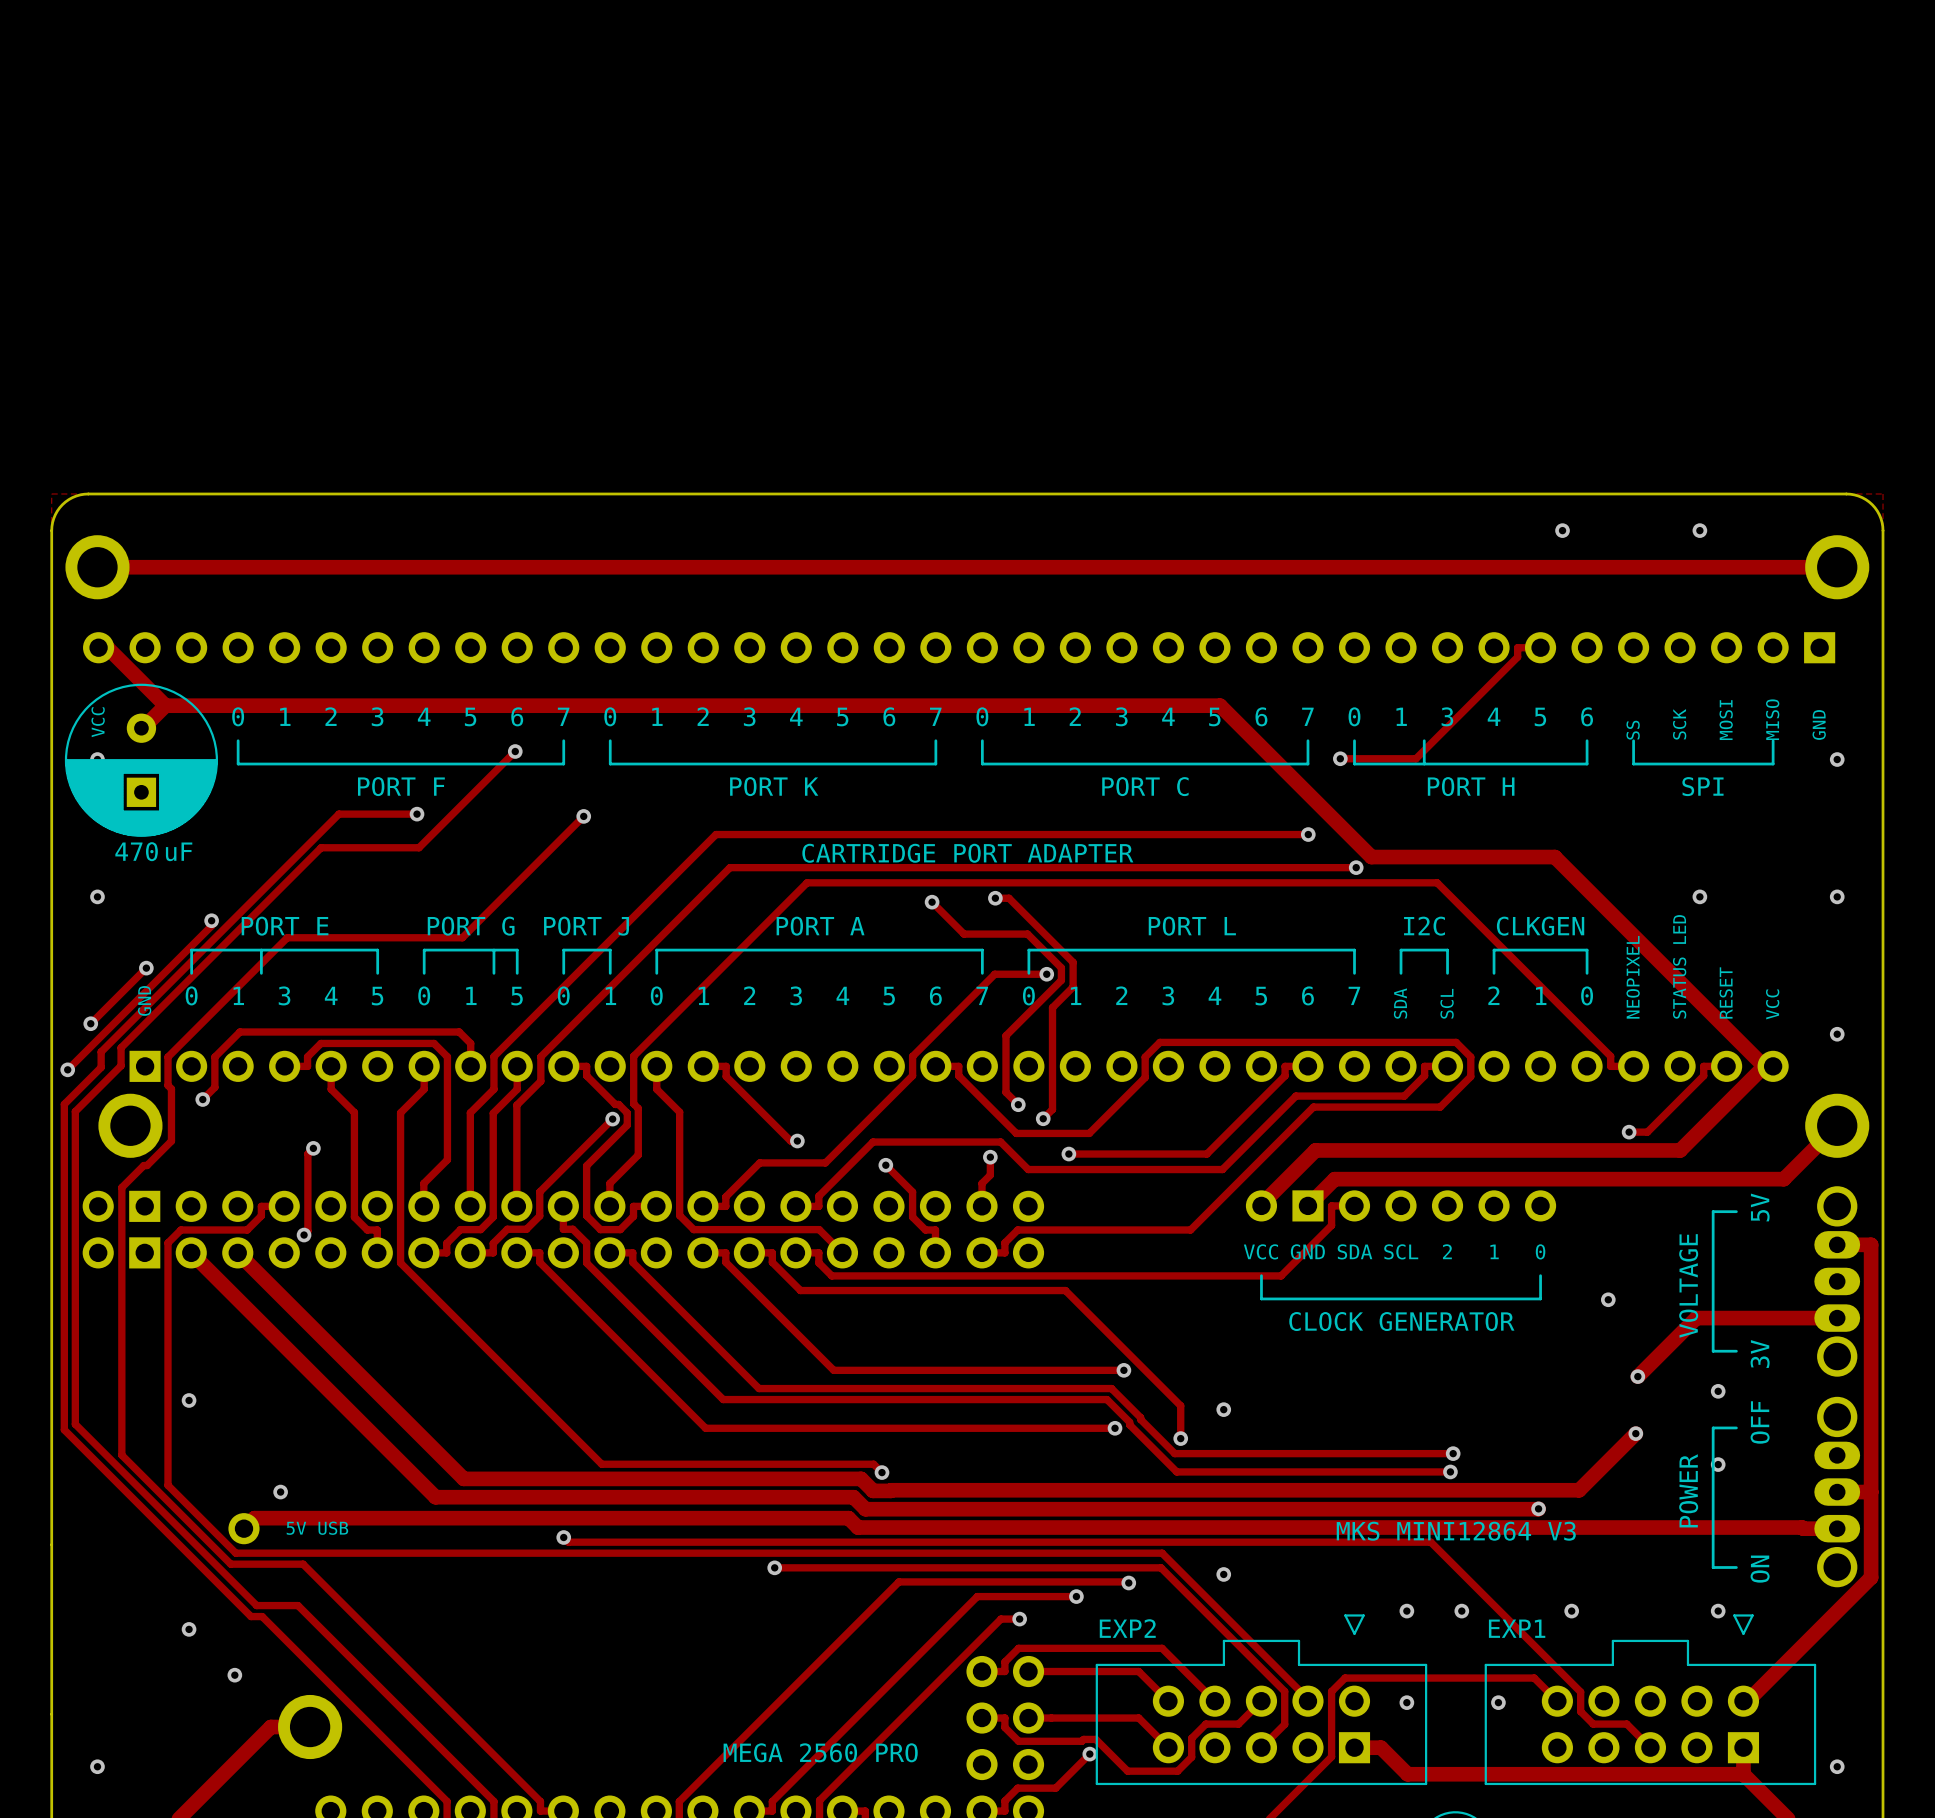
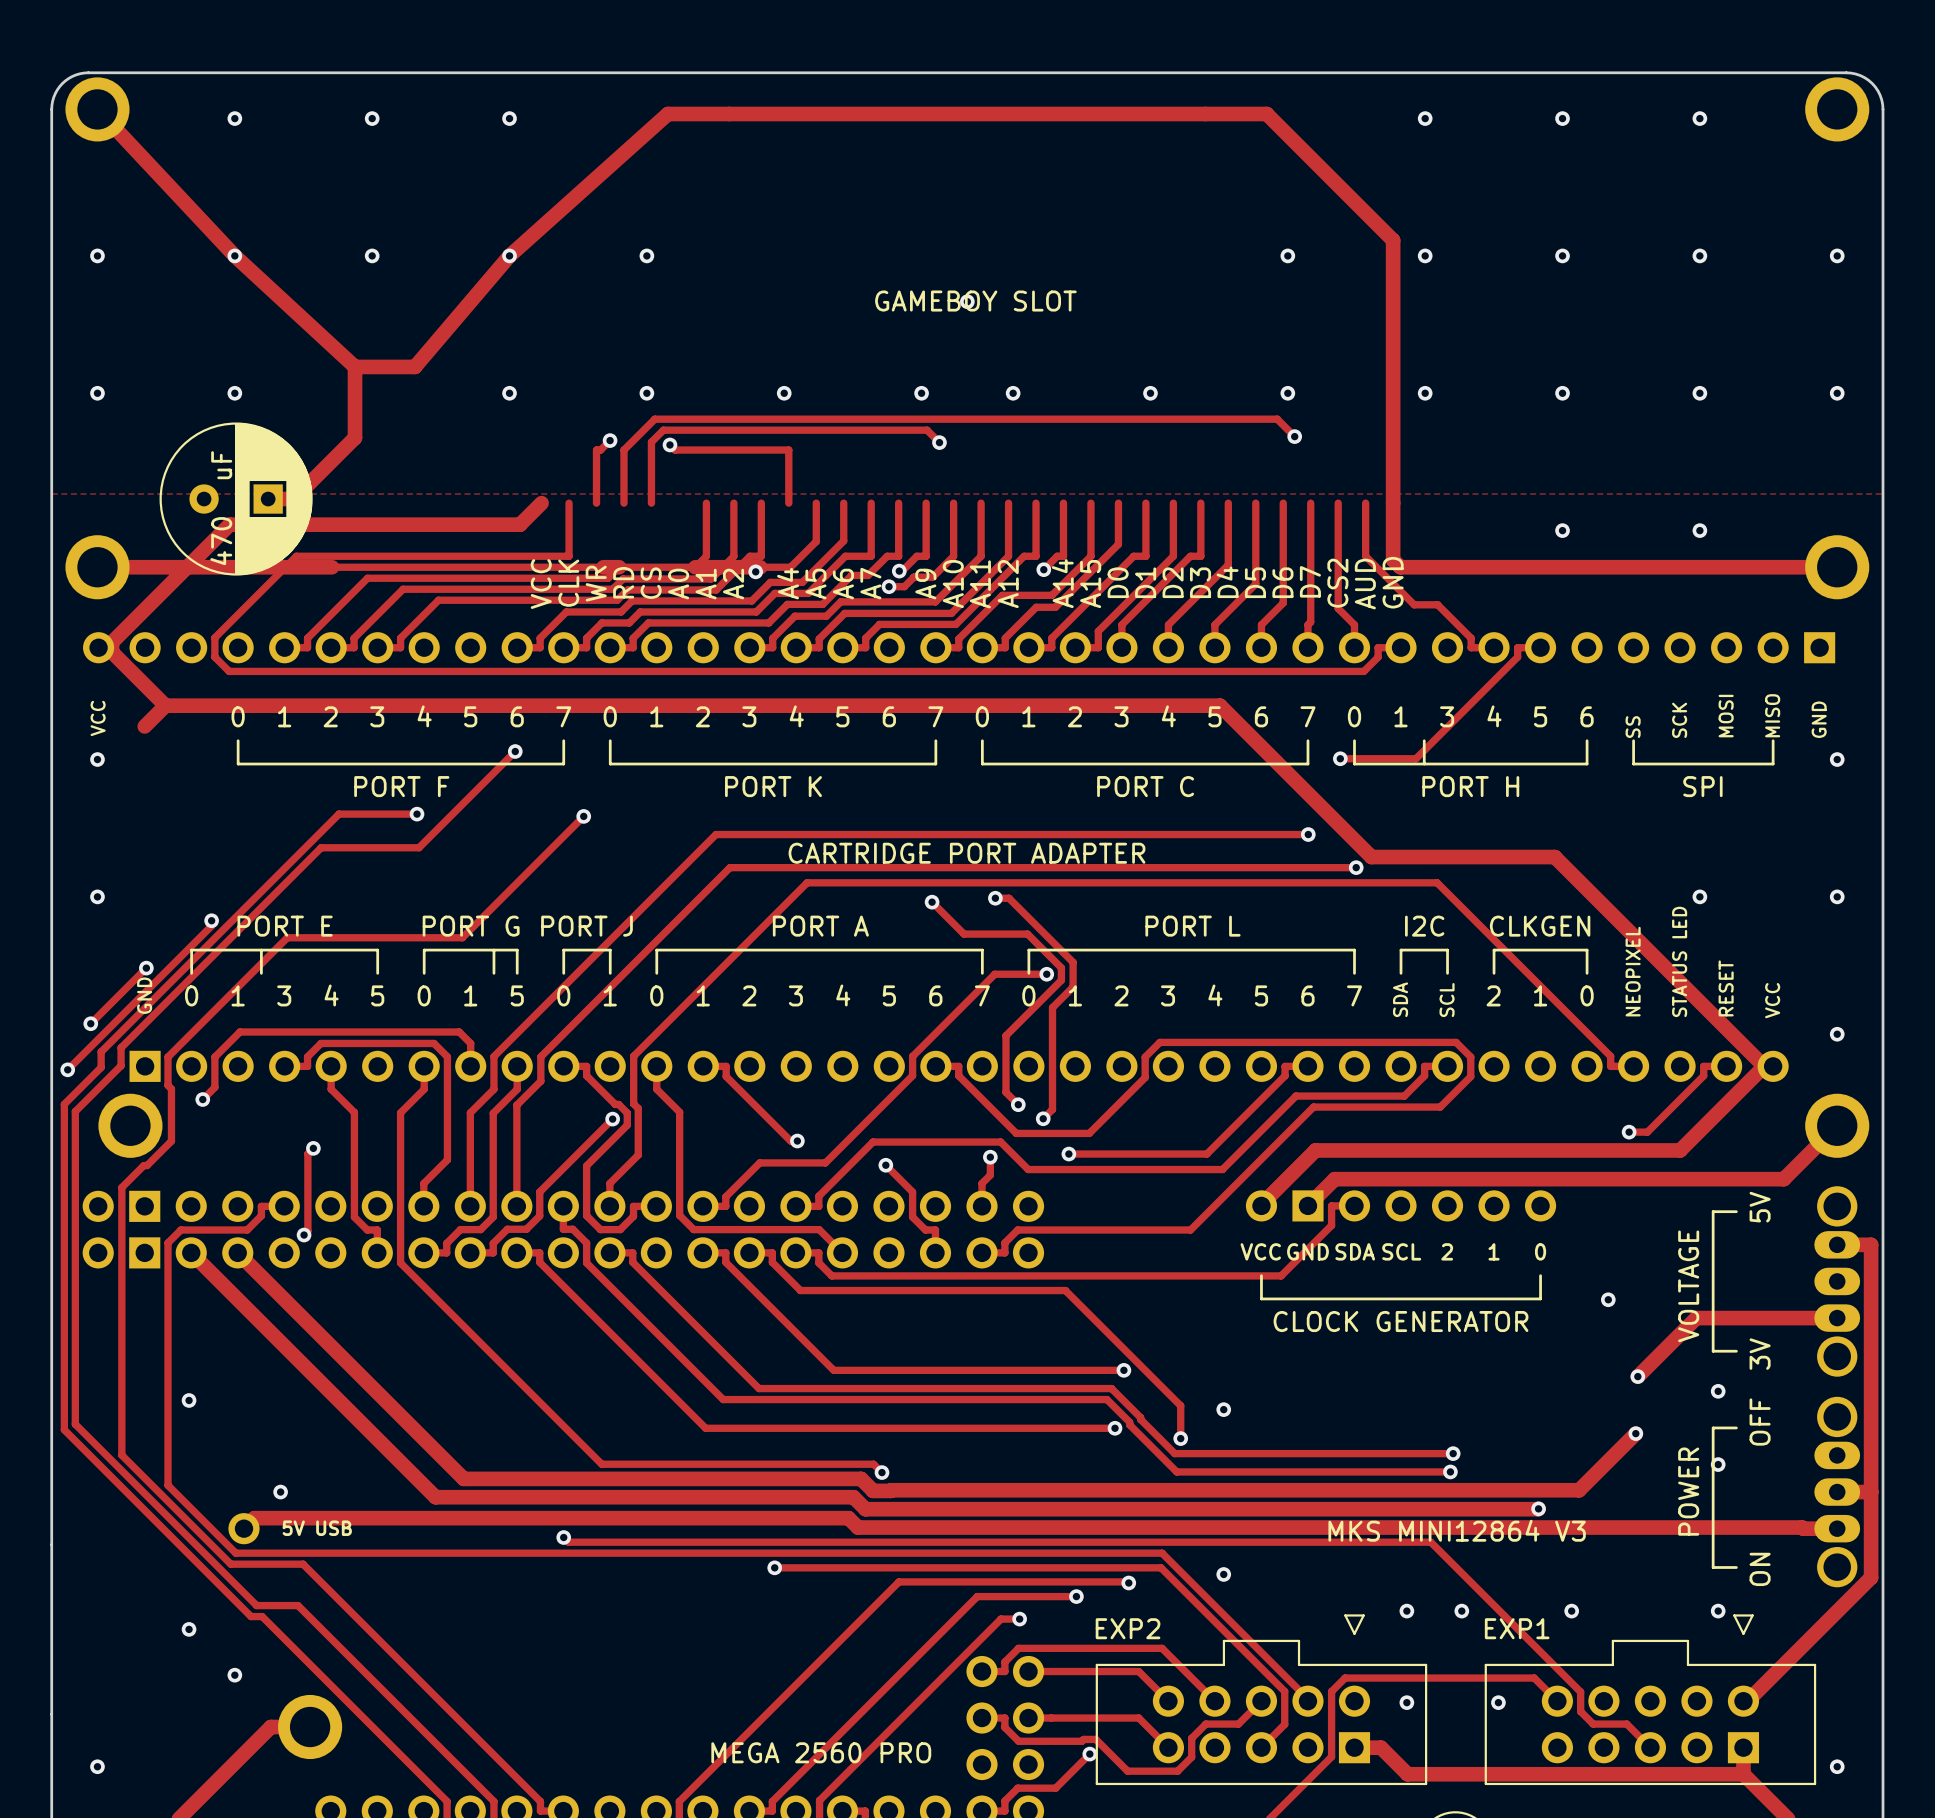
track: none -> (97, 109) (234, 255) (355, 366)
part: none -> (97, 109)
part: none -> (1837, 109)
via: none -> (234, 118)
via: none -> (372, 118)
via: none -> (509, 118)
via: none -> (1425, 118)
via: none -> (1562, 118)
via: none -> (1699, 118)
via: none -> (97, 255)
via: none -> (234, 255)
via: none -> (372, 255)
via: none -> (509, 255)
via: none -> (646, 255)
via: none -> (1287, 255)
via: none -> (1425, 255)
via: none -> (1562, 255)
via: none -> (1699, 255)
via: none -> (1837, 255)
via: none -> (967, 301)
text: none -> GAMEBOY SLOT (975, 301)
track: none -> (355, 366) (355, 437) (293, 499) (268, 499)
via: none -> (97, 393)
via: none -> (234, 393)
via: none -> (509, 393)
via: none -> (646, 393)
via: none -> (784, 393)
via: none -> (921, 393)
via: none -> (1013, 393)
via: none -> (1150, 393)
via: none -> (1287, 393)
via: none -> (1425, 393)
via: none -> (1562, 393)
via: none -> (1699, 393)
via: none -> (1837, 393)
track: none -> (1294, 436) (1277, 419) (654, 419) (623, 450) (623, 503)
via: none -> (1294, 436)
track: none -> (610, 440) (600, 450) (596, 450) (596, 503)
via: none -> (610, 440)
track: none -> (939, 442) (927, 430) (663, 430) (651, 442) (651, 503)
via: none -> (939, 442)
track: none -> (669, 444) (675, 450) (788, 450) (788, 503)
via: none -> (669, 444)
track: none -> (541, 503) (520, 524) (229, 524) (112, 642) (112, 652)
track: none -> (569, 503) (569, 556) (296, 556) (214, 637) (214, 657) (229, 671) (1363, 671) (1378, 657) (1378, 647) (1401, 647)
track: none -> (706, 503) (706, 556) (695, 567)
track: none -> (733, 503) (733, 556) (711, 578) (623, 578) (612, 589) (403, 589) (354, 638) (354, 647) (331, 647)
track: none -> (761, 503) (761, 556) (749, 556) (716, 589) (627, 589) (617, 600) (438, 600) (400, 638) (400, 647) (377, 647)
track: none -> (816, 503) (816, 541) (790, 567)
track: none -> (843, 503) (843, 540) (802, 582) (770, 582) (751, 600) (632, 600) (621, 611) (566, 611) (540, 638) (540, 647) (517, 647)
track: none -> (871, 503) (871, 556) (845, 556) (808, 593) (774, 593) (756, 611) (640, 611) (629, 622) (601, 622) (586, 638) (586, 647) (563, 647)
track: none -> (898, 503) (898, 556) (887, 556) (868, 575) (851, 575) (822, 604) (787, 604) (768, 622) (648, 622) (633, 638) (633, 647) (610, 647)
track: none -> (926, 503) (926, 556) (916, 556) (902, 571) (899, 571)
track: none -> (953, 503) (953, 556) (932, 577) (913, 577) (904, 586) (888, 586)
track: none -> (981, 503) (981, 556) (935, 601) (840, 601) (826, 616) (794, 616) (772, 638) (772, 647) (749, 647)
track: none -> (1008, 503) (1008, 556) (951, 613) (844, 613) (819, 638) (819, 647) (796, 647)
track: none -> (1036, 503) (1036, 556) (1024, 556) (955, 624) (879, 624) (865, 638) (865, 647) (842, 647)
track: none -> (1063, 503) (1063, 556) (1057, 556) (1043, 569)
track: none -> (1090, 503) (1090, 556) (1051, 595) (1002, 595) (958, 638) (958, 647) (935, 647)
track: none -> (1118, 503) (1118, 544) (1055, 607) (1036, 607) (1005, 638) (1005, 647) (982, 647)
track: none -> (1145, 503) (1145, 556) (1133, 556) (1051, 638) (1051, 647) (1028, 647)
track: none -> (1173, 503) (1173, 556) (1098, 631) (1098, 647) (1075, 647)
track: none -> (1200, 503) (1200, 556) (1190, 556) (1121, 624) (1121, 647)
track: none -> (1228, 503) (1228, 564) (1168, 624) (1168, 647)
track: none -> (1255, 503) (1255, 583) (1214, 624) (1214, 647)
track: none -> (1283, 503) (1283, 603) (1261, 624) (1261, 647)
track: none -> (1310, 503) (1310, 622) (1307, 624) (1307, 647)
track: none -> (1338, 503) (1338, 608) (1354, 624) (1354, 647)
track: none -> (1365, 503) (1365, 556) (1414, 604) (1437, 604) (1471, 638) (1471, 647) (1494, 647)
board edge: (51, 530) (55, 514) (62, 504) (76, 496) (88, 493) (1846, 493) (1862, 497) (1872, 504) (1879, 514) (1883, 530) -> (51, 530) (51, 105) (55, 93) (65, 80) (76, 74) (88, 72) (1855, 74) (1864, 77) (1875, 87) (1881, 99) (1883, 109) (1883, 530)
track width: thick (97, 567) (603, 567) -> thin (97, 567) (603, 567)
track: none -> (619, 567) (608, 578) (367, 578) (307, 638) (307, 647) (284, 647)
track width: thick (619, 567) (695, 567) -> thin (619, 567) (695, 567)
track width: thick (760, 567) (790, 567) -> thin (760, 567) (790, 567)
track: (790, 567) (1400, 567) -> (355, 366) (414, 366) (509, 255) (667, 114) (1266, 114) (1393, 240) (1393, 559) (1400, 567)
via: none -> (1043, 569)
via: none -> (755, 571)
via: none -> (899, 571)
text: none -> CLK (568, 583)
text: none -> D4 (1227, 582)
text: none -> D7 (1310, 581)
text: none -> GND (1393, 582)
text: none -> VCC (541, 584)
text: none -> WR (596, 583)
text: none -> RD (623, 582)
text: none -> CS (651, 583)
text: none -> A0 (678, 584)
text: none -> A1 (706, 584)
text: none -> A4 (788, 583)
text: none -> A5 (815, 584)
text: none -> A6 (843, 584)
text: none -> A7 (870, 583)
text: none -> A9 (925, 584)
text: none -> A10 (953, 584)
text: none -> A14 (1062, 583)
text: none -> A15 (1090, 584)
text: none -> D0 (1118, 582)
text: none -> D1 (1145, 582)
text: none -> D2 (1173, 582)
text: none -> D3 (1200, 582)
text: none -> D5 (1255, 582)
text: none -> D6 (1282, 582)
text: none -> CS2 (1337, 583)
text: none -> AUD (1365, 584)
text: none -> A2 (733, 584)
text: none -> A11 (980, 584)
text: none -> A12 (1008, 584)
via: none -> (888, 586)
part rotation: 0° (141, 760) -> 90° counterclockwise (236, 499)
part position: (141, 760) -> (236, 499)
text rotation: 0° (136, 851) -> 90° counterclockwise (221, 541)
text position: 470 (136, 851) -> 470 (221, 541)
text rotation: 0° (179, 851) -> 90° counterclockwise (221, 465)
text position: uF (179, 851) -> uF (221, 465)

